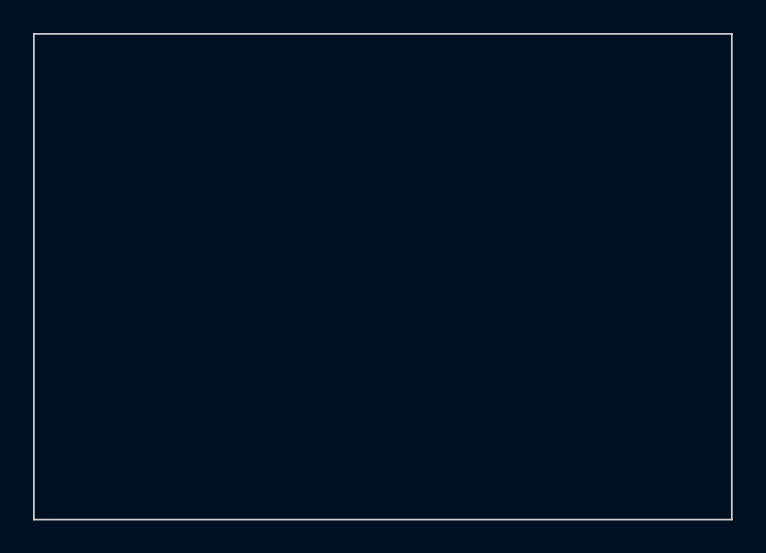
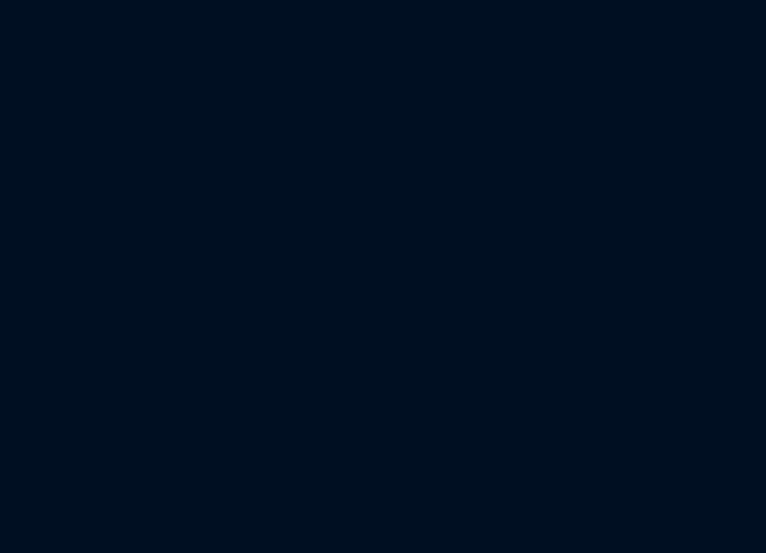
board edge: (33, 33) (731, 33) (731, 519) (33, 519) (33, 33) -> none

